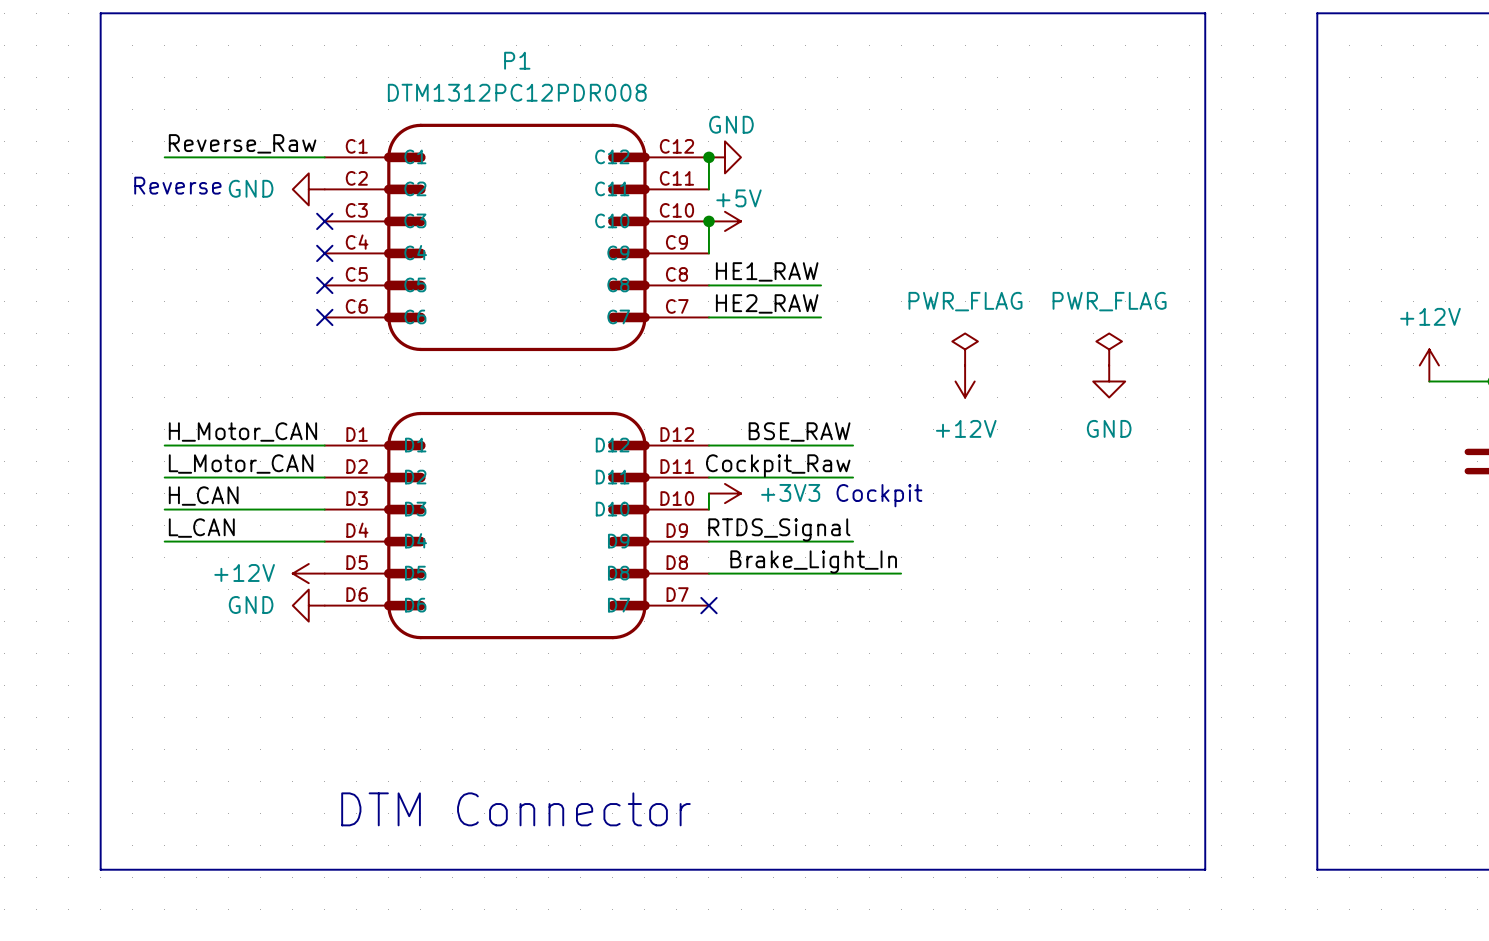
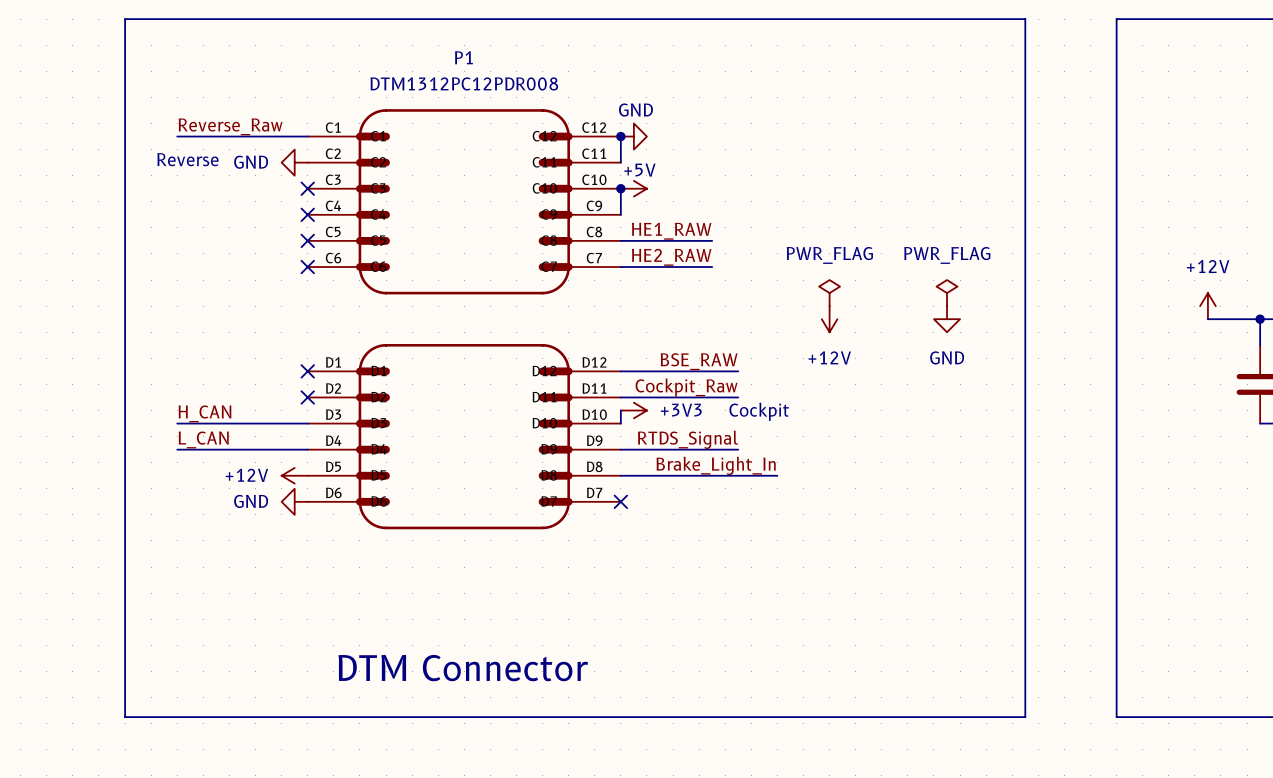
label: H_Motor_CAN (242, 431) -> none
wire: (164, 445) (324, 445) -> none
no-connect mark: none -> (307, 371)
label: L_Motor_CAN (241, 464) -> none
wire: (164, 477) (324, 477) -> none
no-connect mark: none -> (307, 397)

